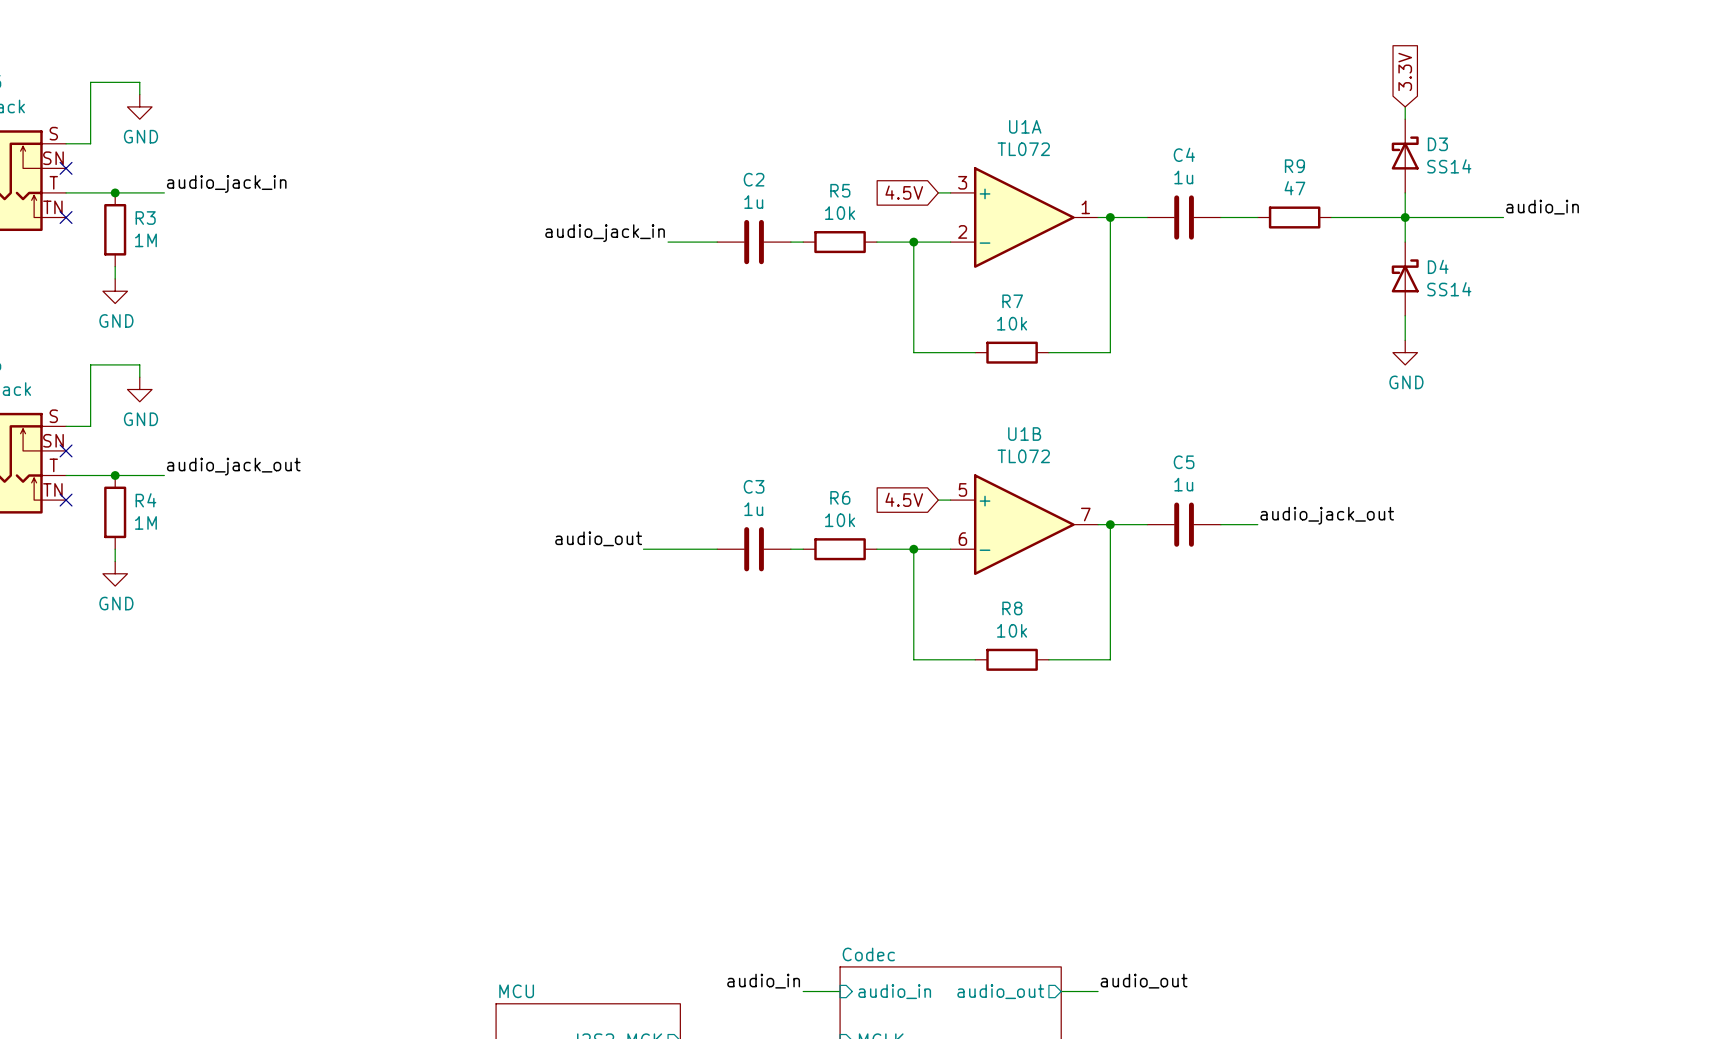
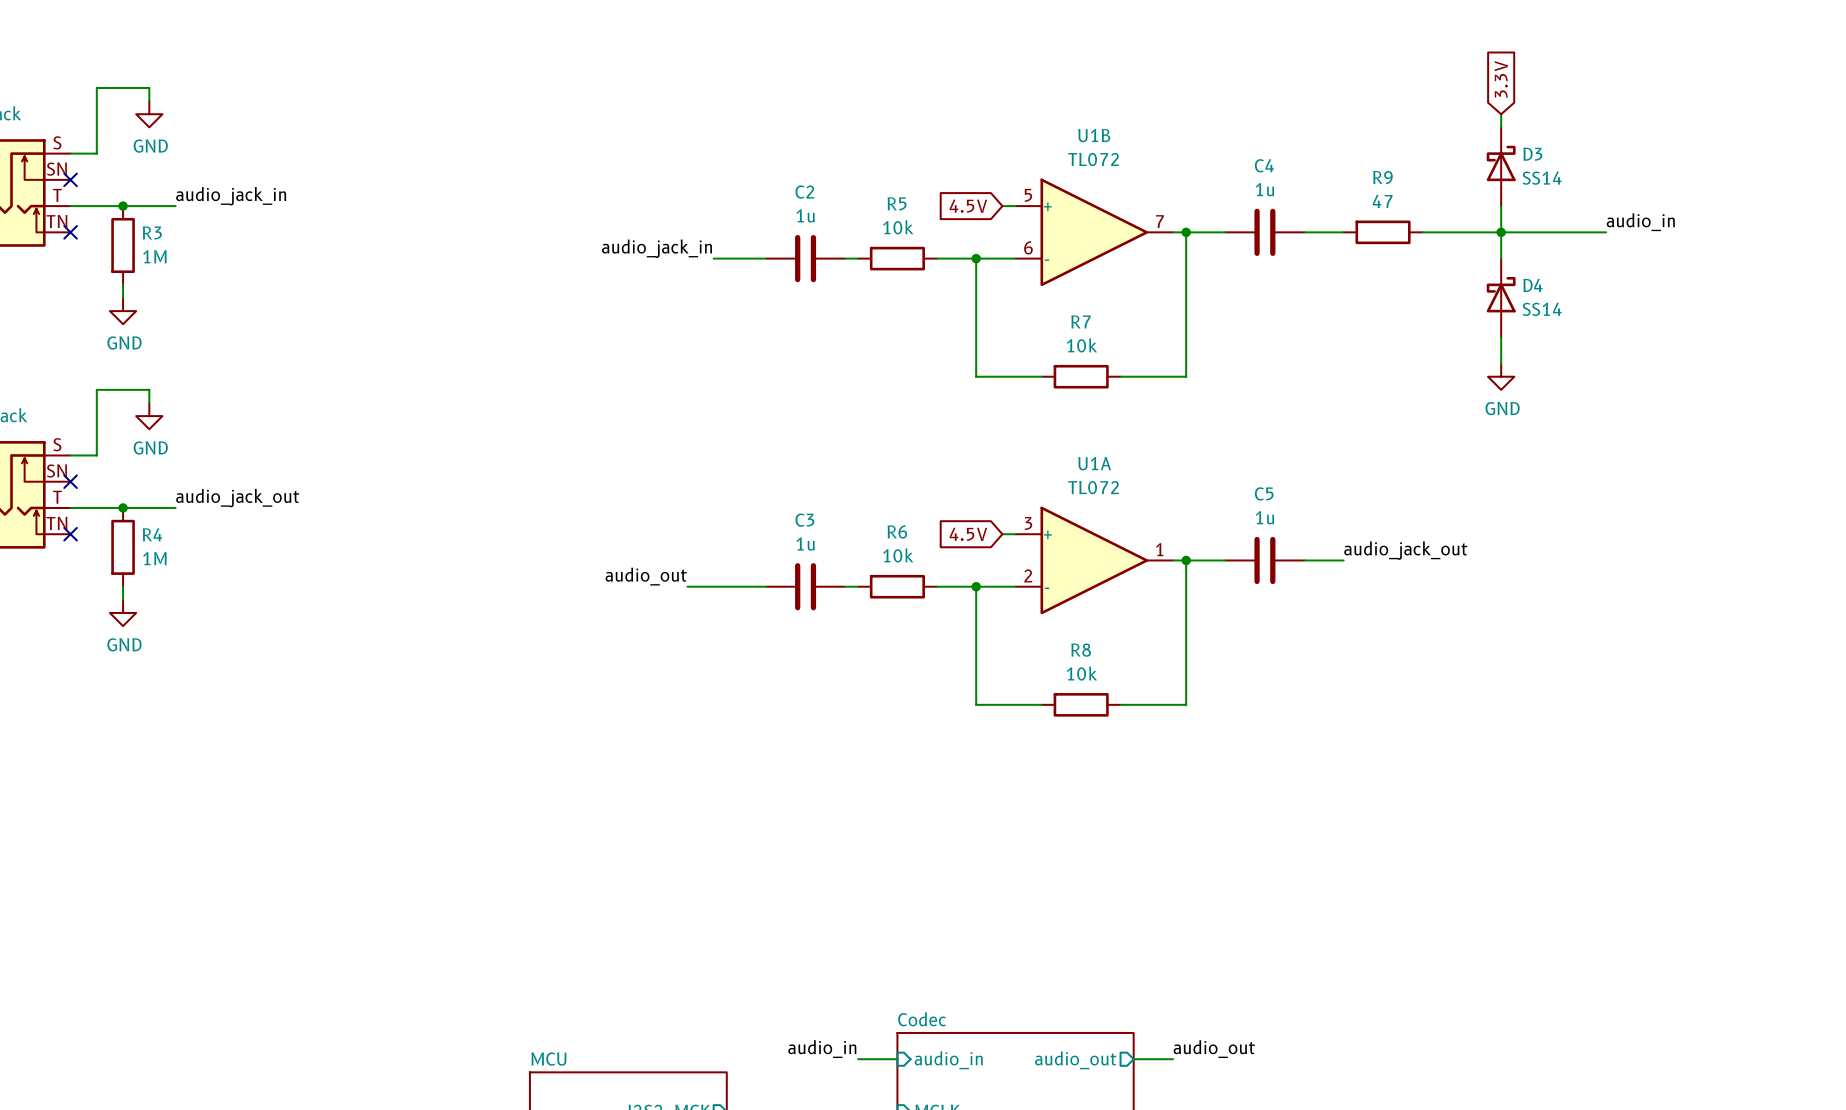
U1A position: (1024, 217) -> (1094, 560)
U1B position: (1024, 524) -> (1094, 232)

